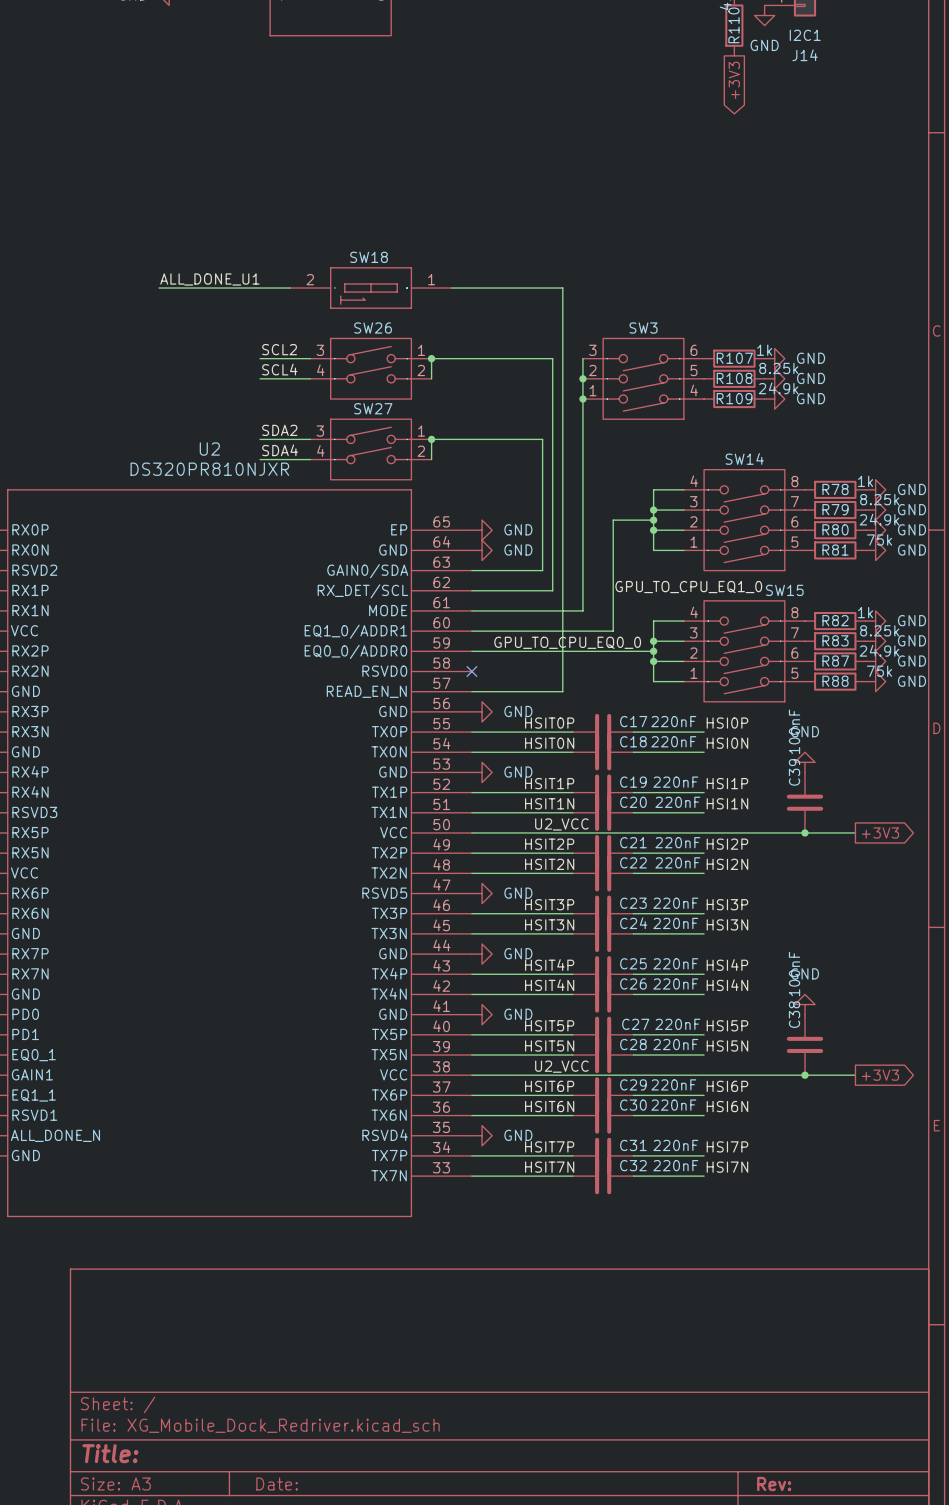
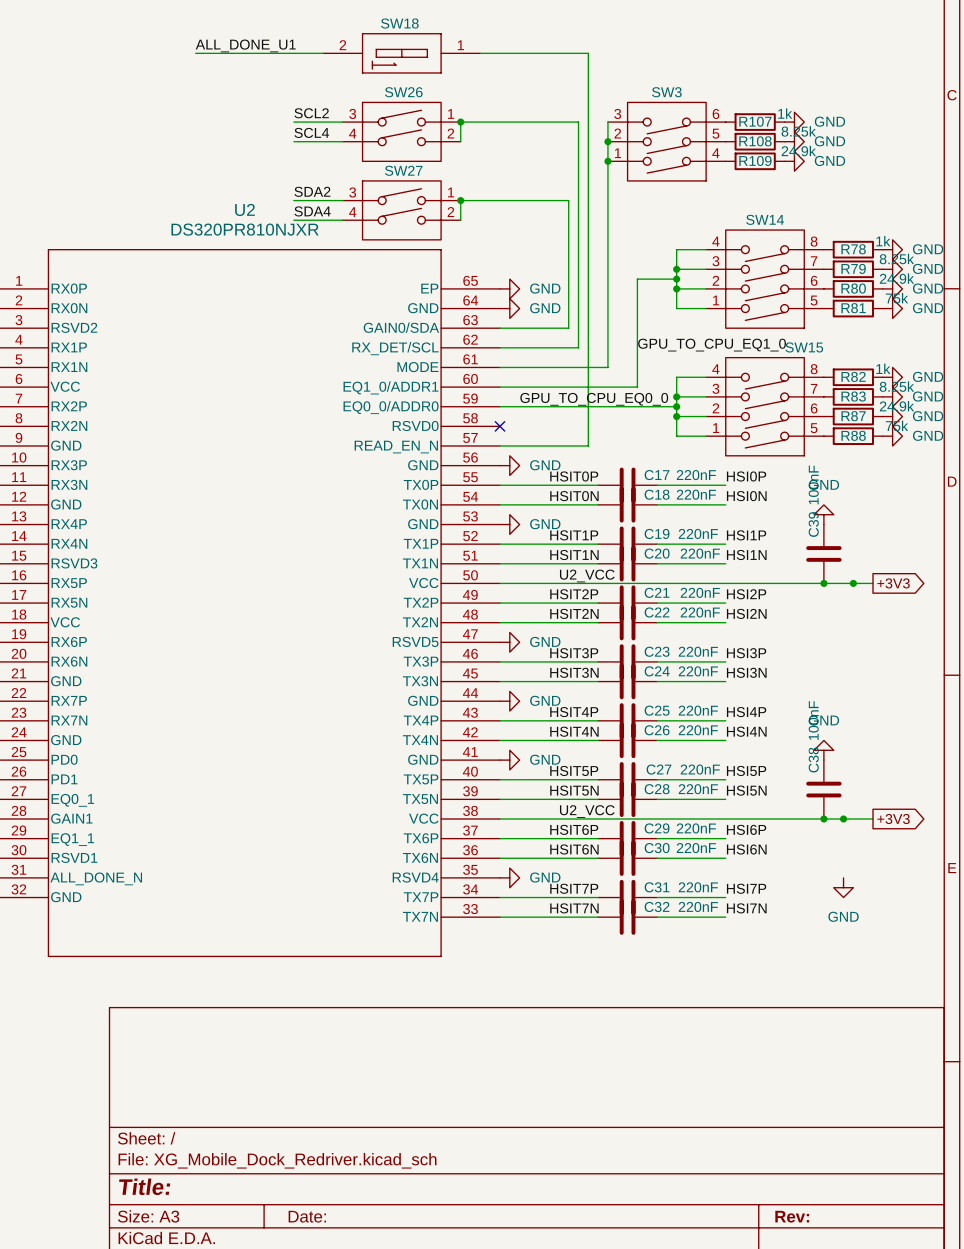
junction: none -> (853, 583)
junction: none -> (843, 819)
power symbol: none -> GND (843, 887)

